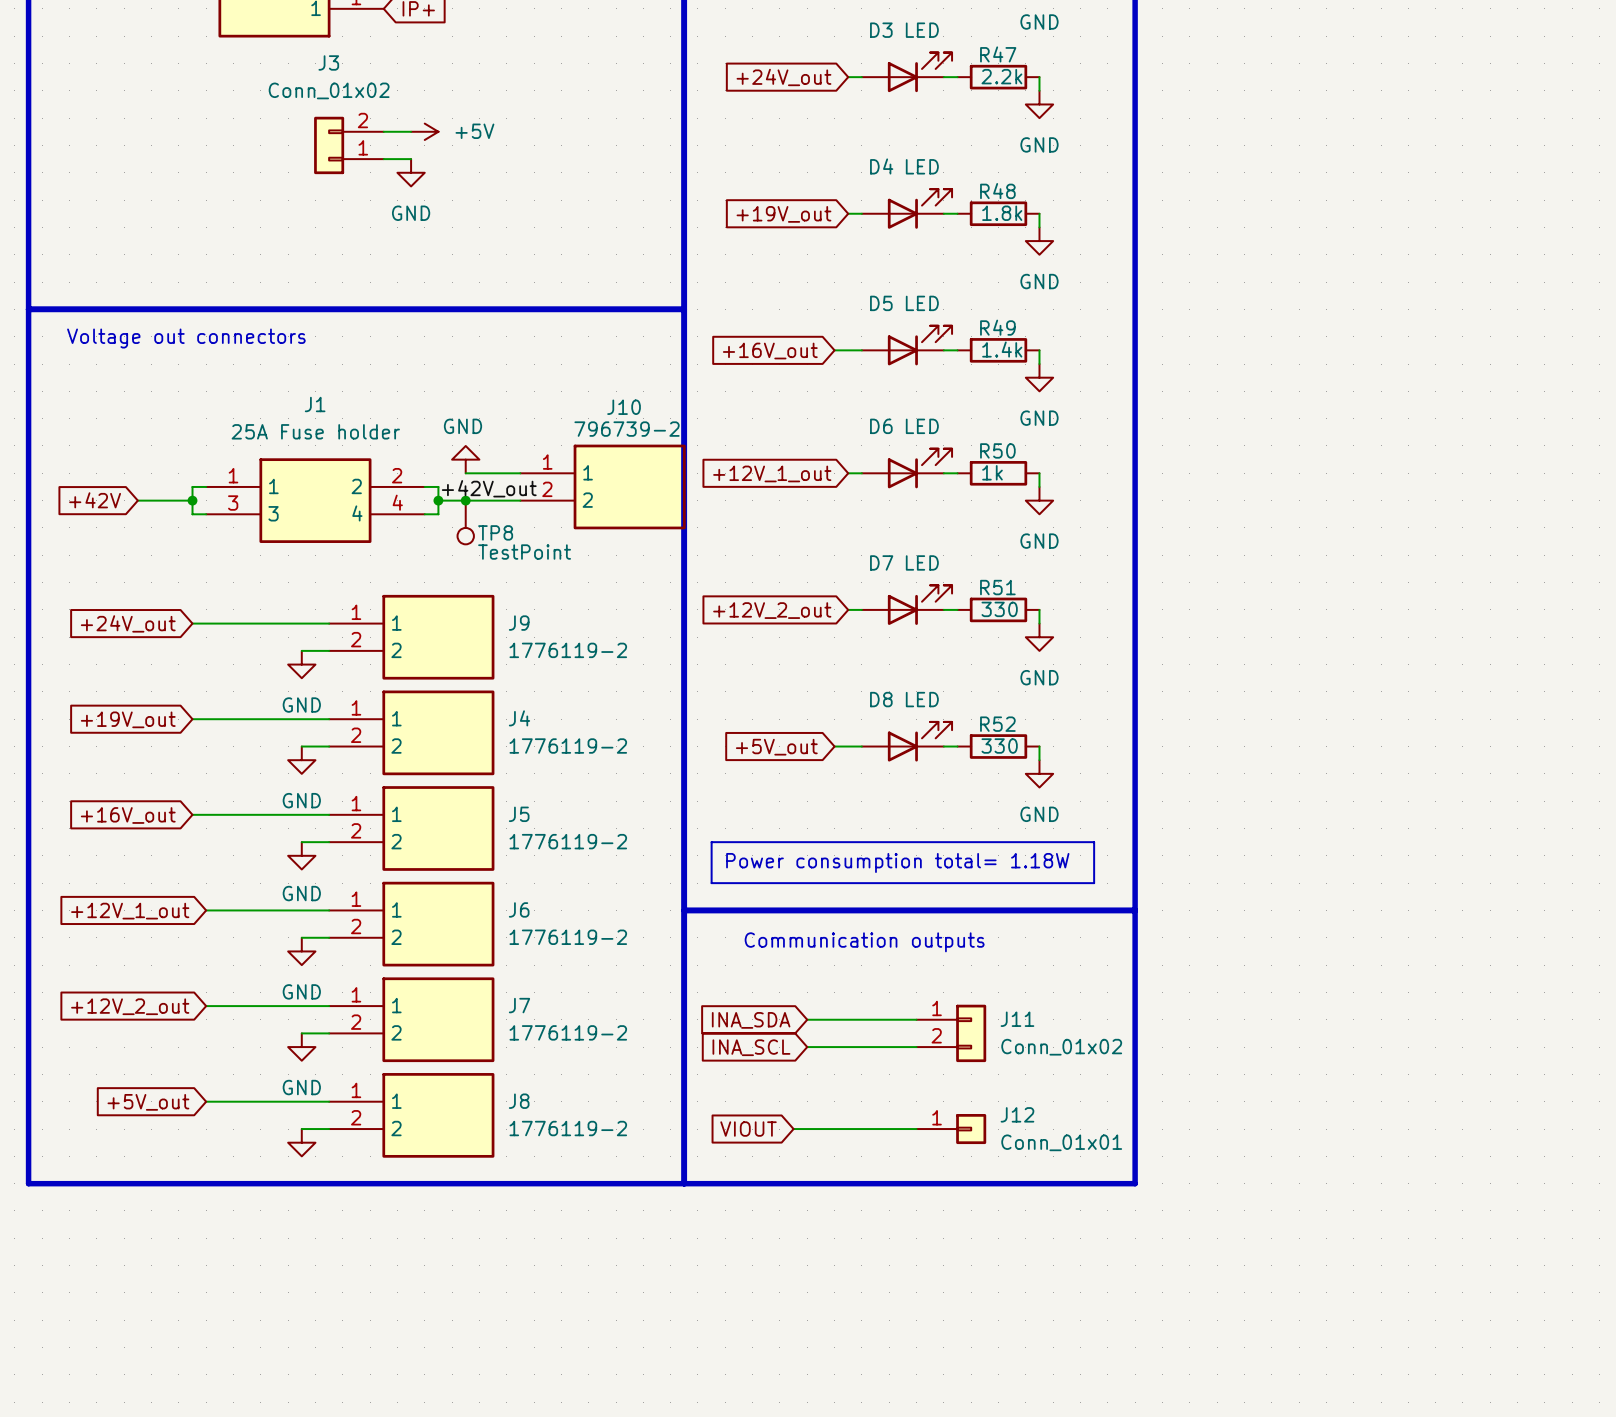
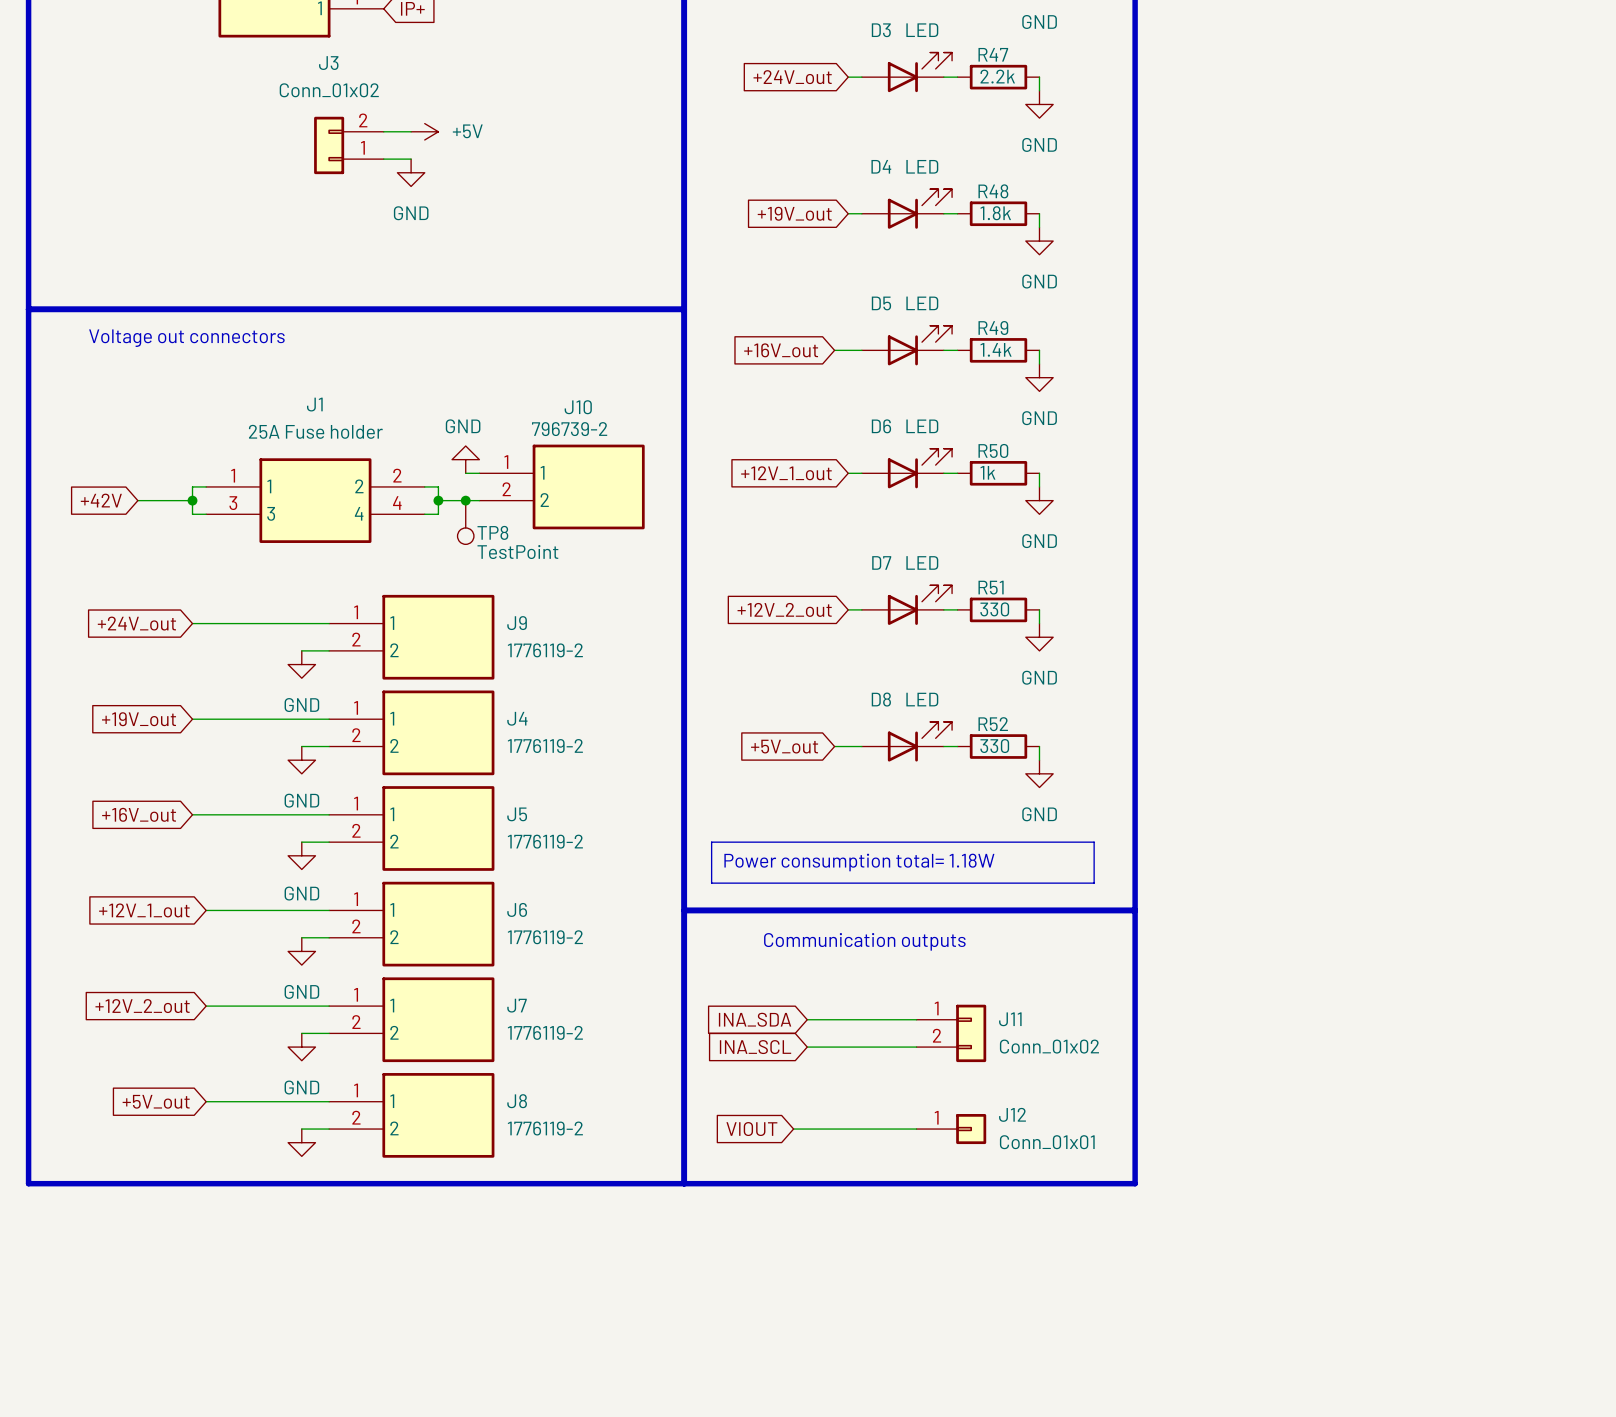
J10 position: (603, 486) -> (562, 486)
label: +42V_out (489, 488) -> none

